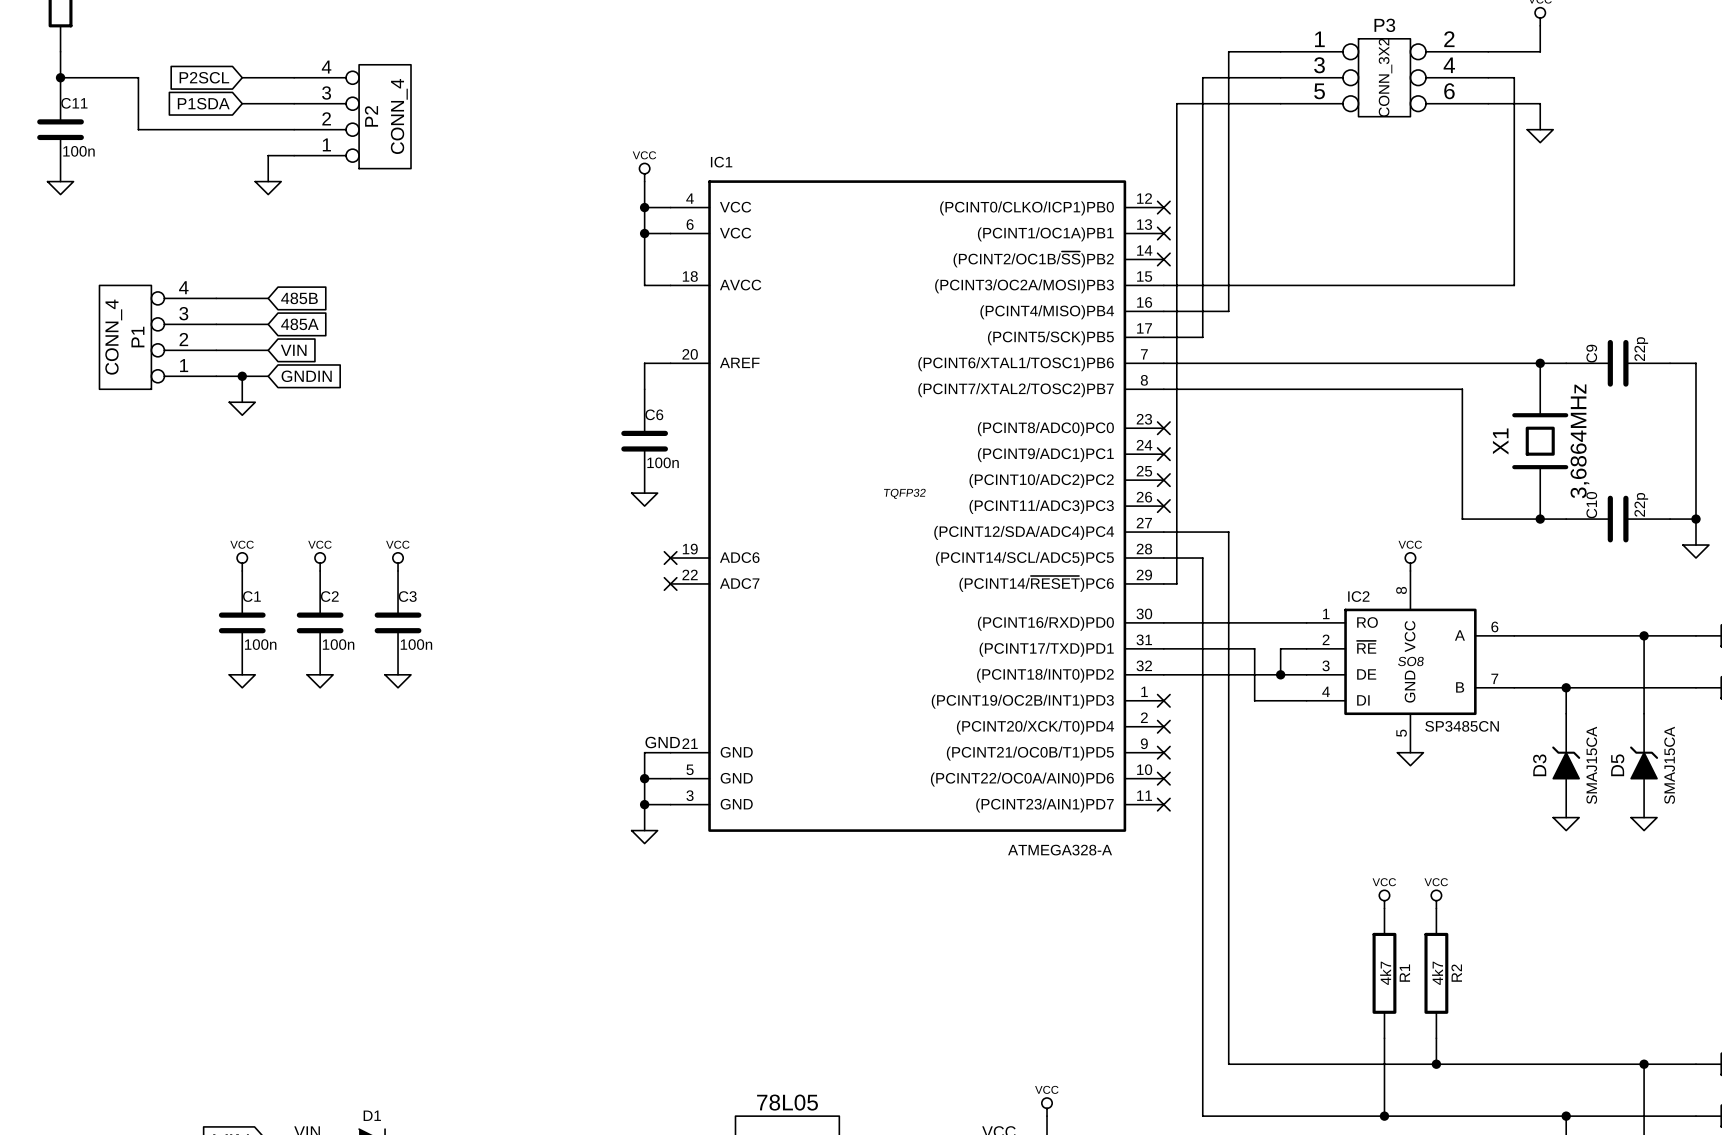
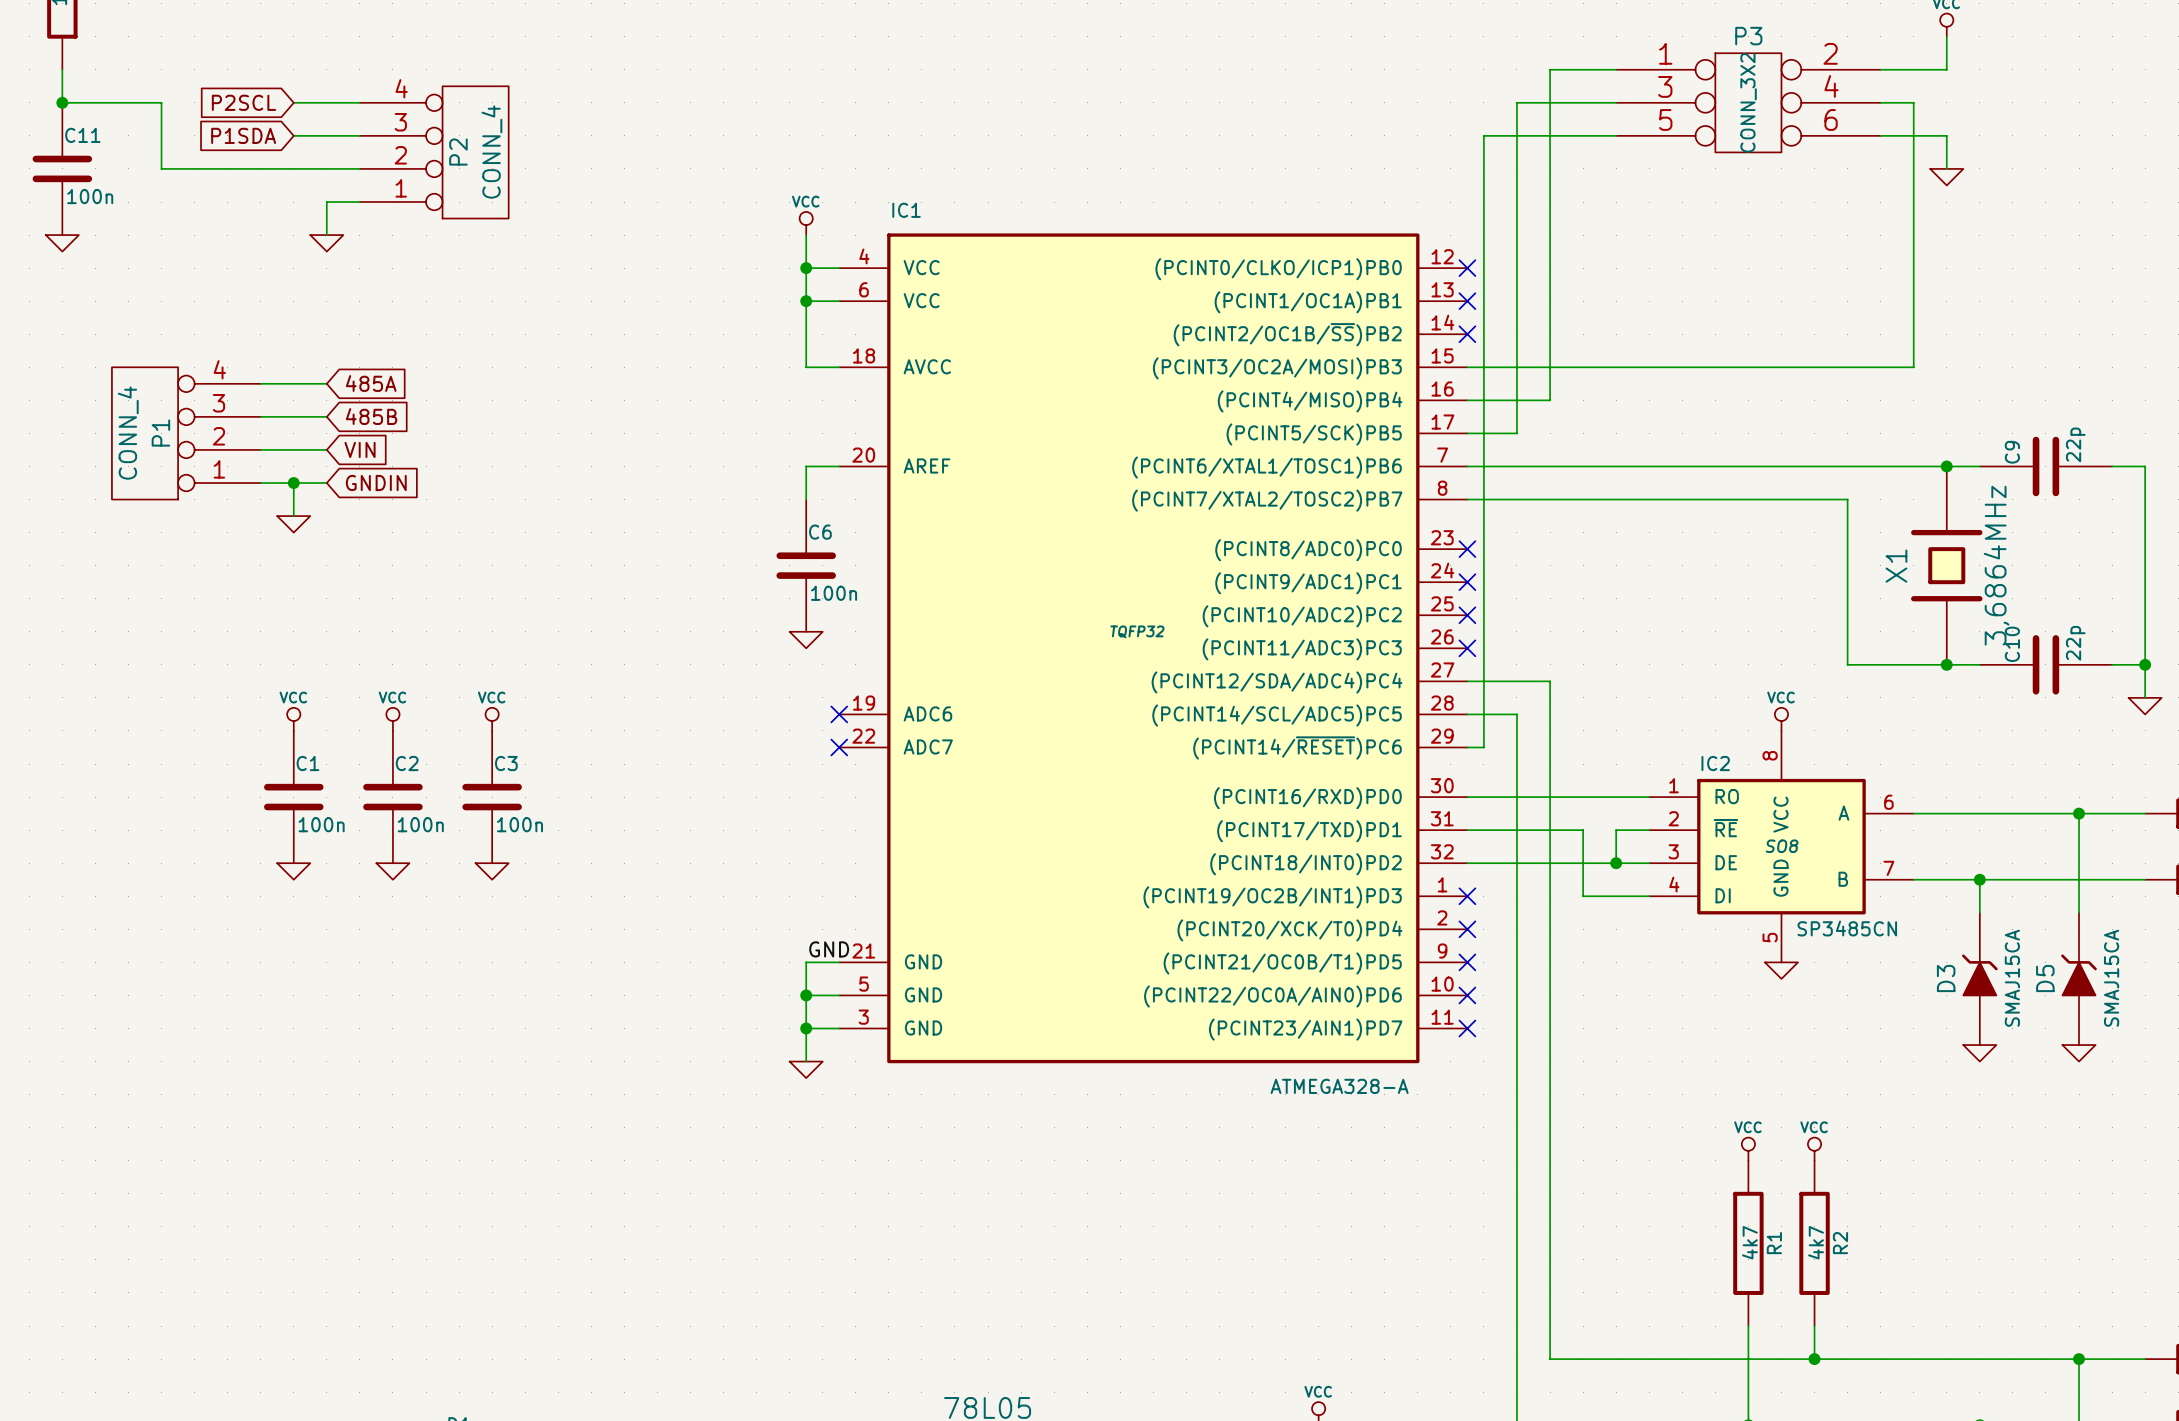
global label: 485B (299, 298) -> 485A (371, 383)
global label: 485A (299, 324) -> 485B (371, 416)

